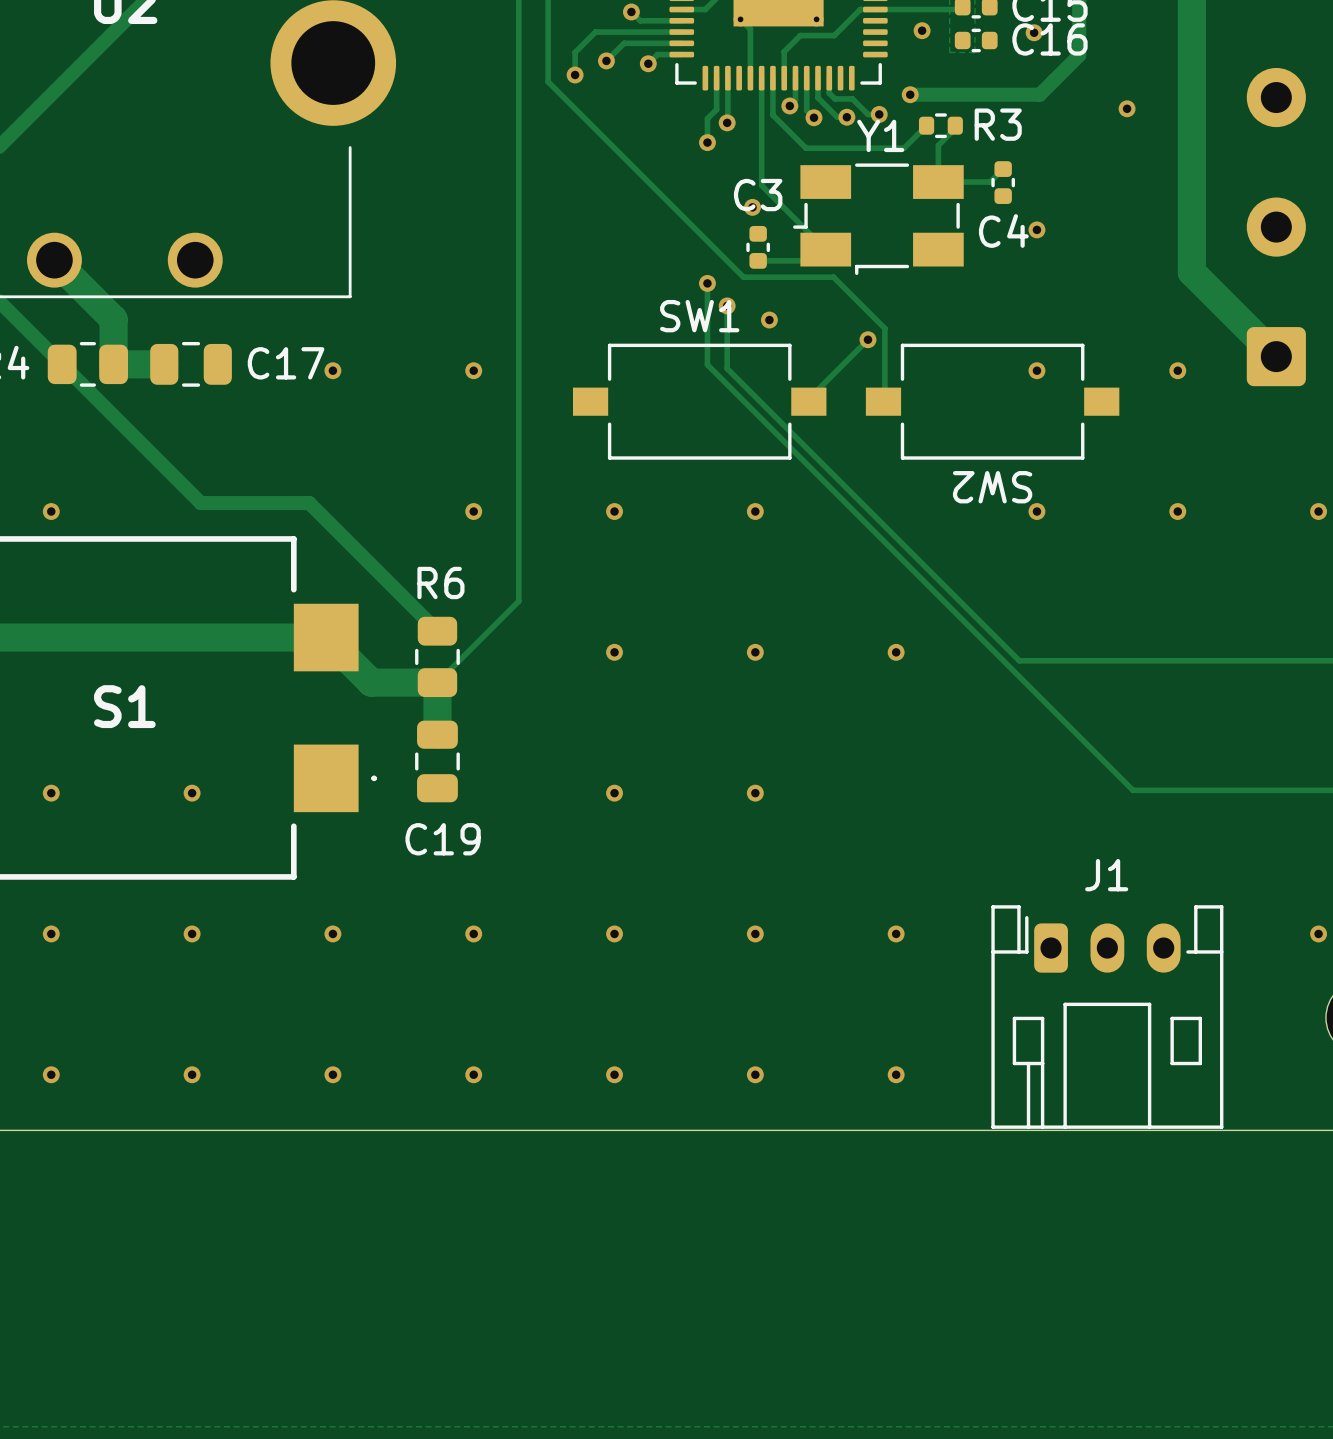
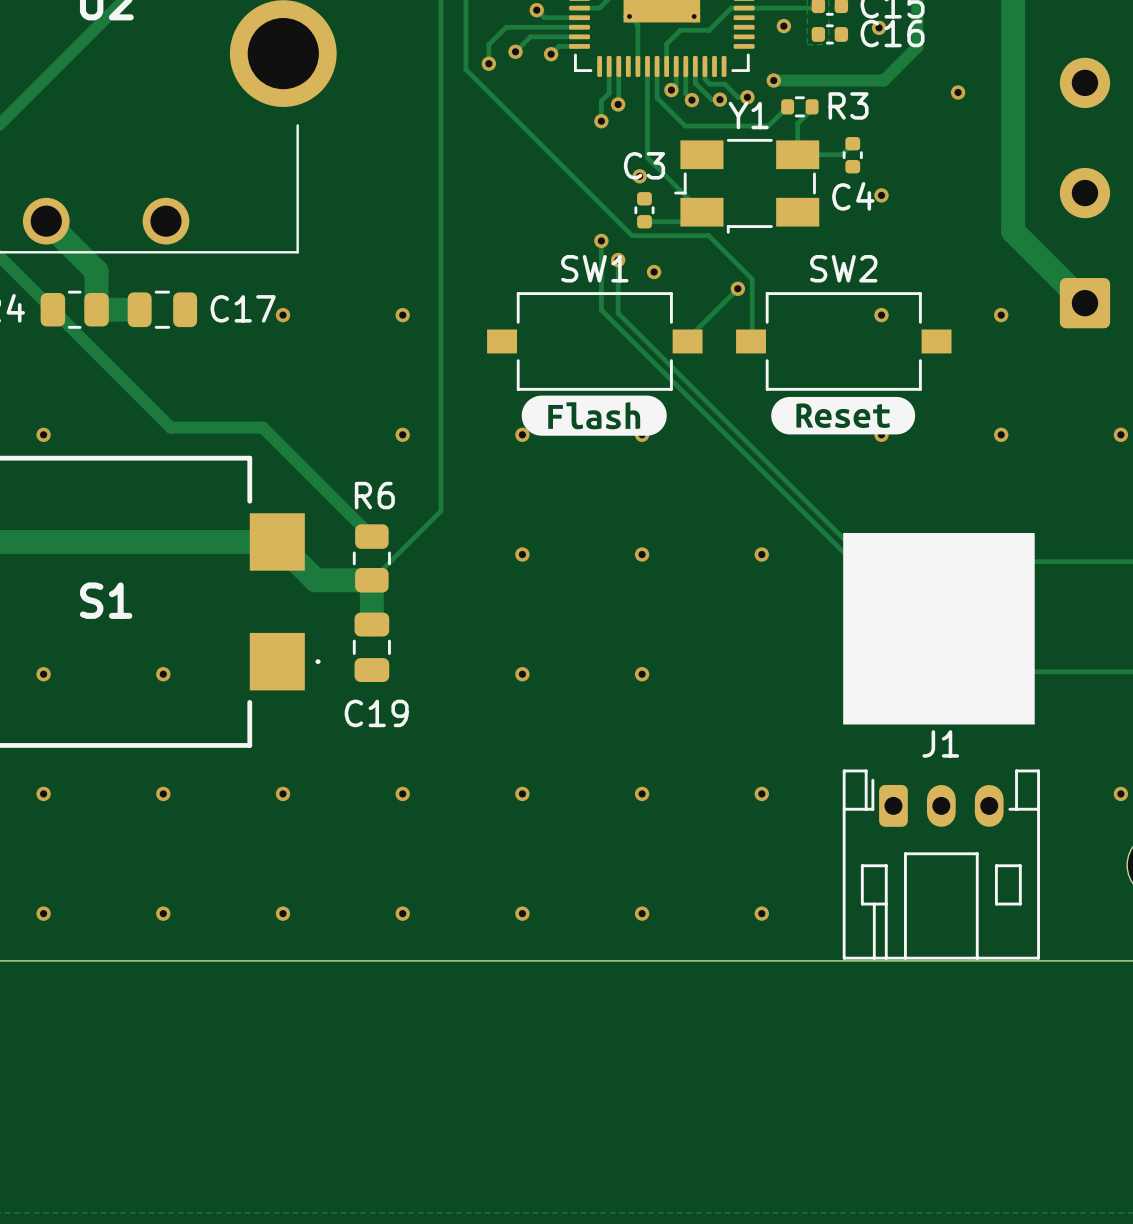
drawing: none -> [521, 395, 667, 436]
drawing: none -> [771, 396, 916, 435]
SW2 name rotation: 0° (992, 487) -> 180° (843, 268)
SW2 name position: SW2 (992, 487) -> SW2 (843, 268)
drawing: none -> [843, 532, 1035, 725]

